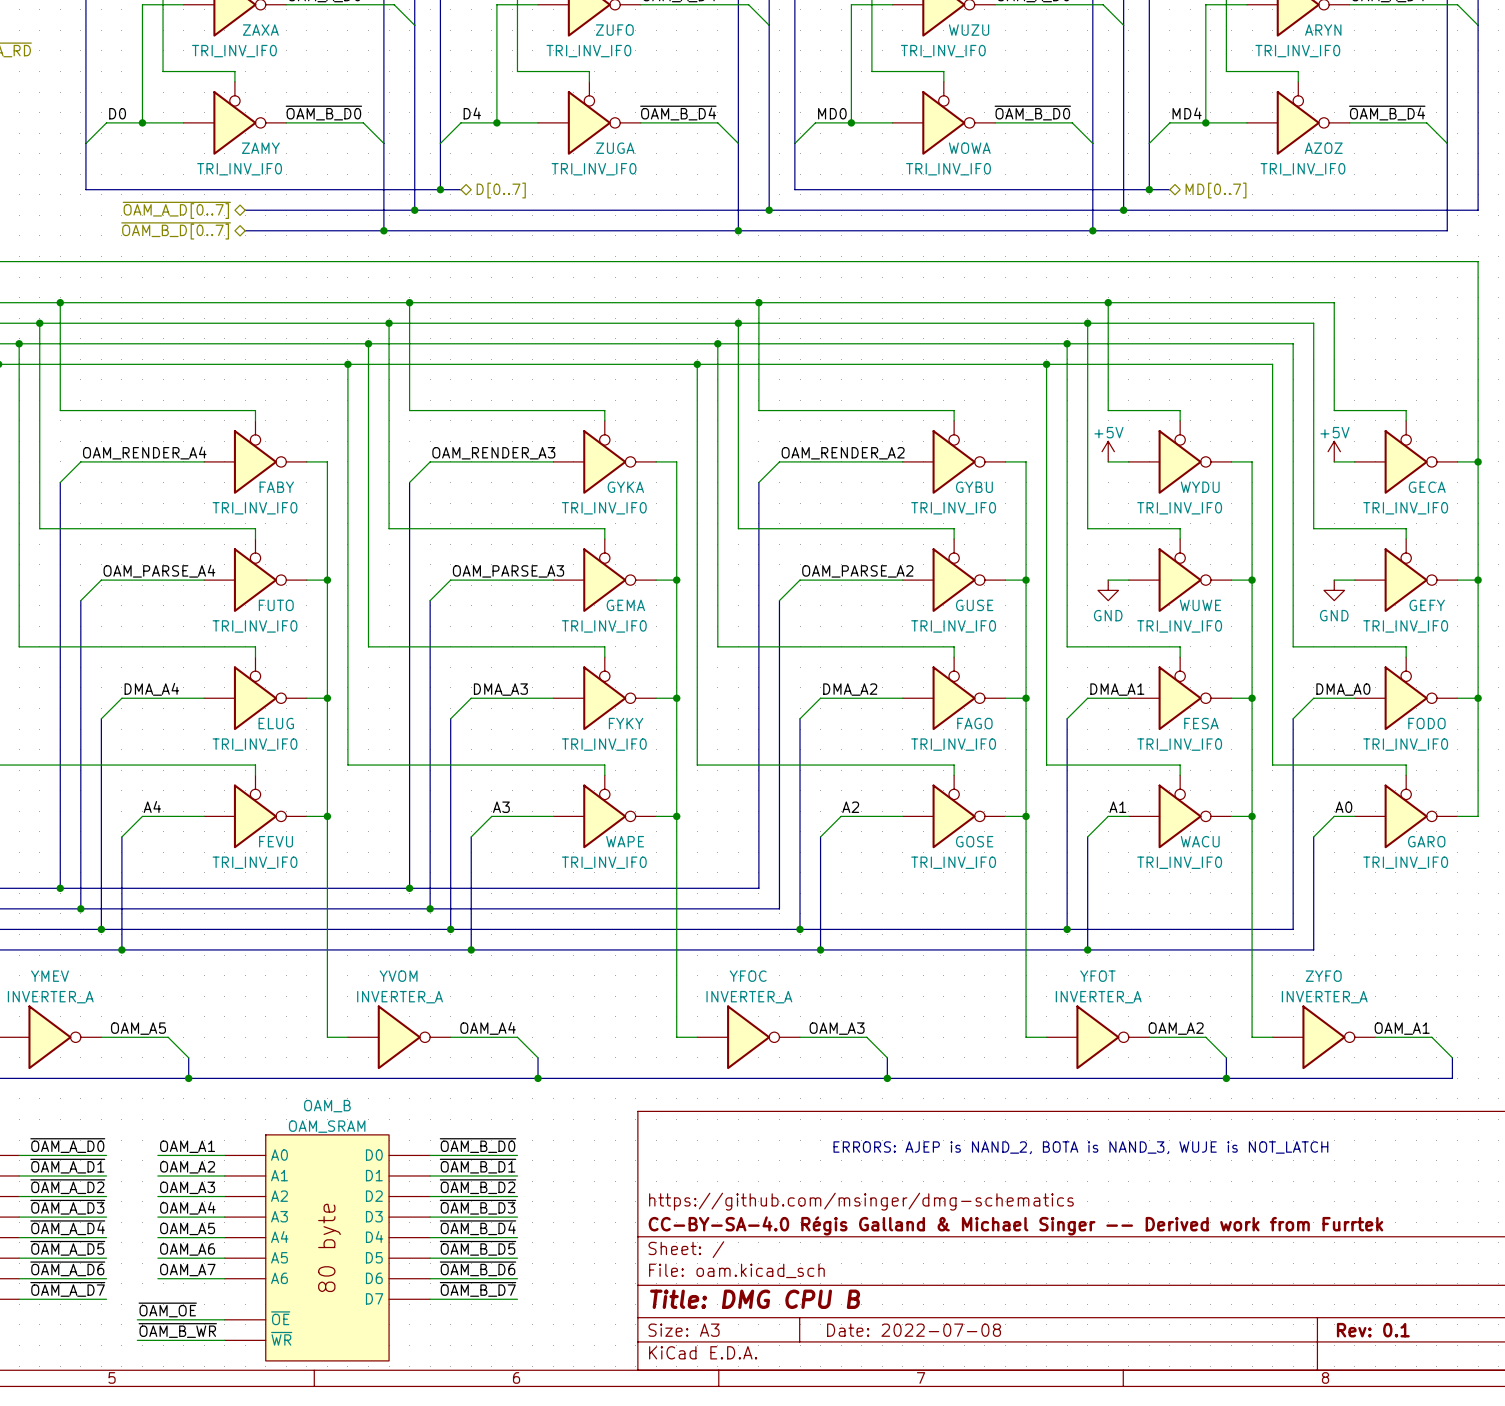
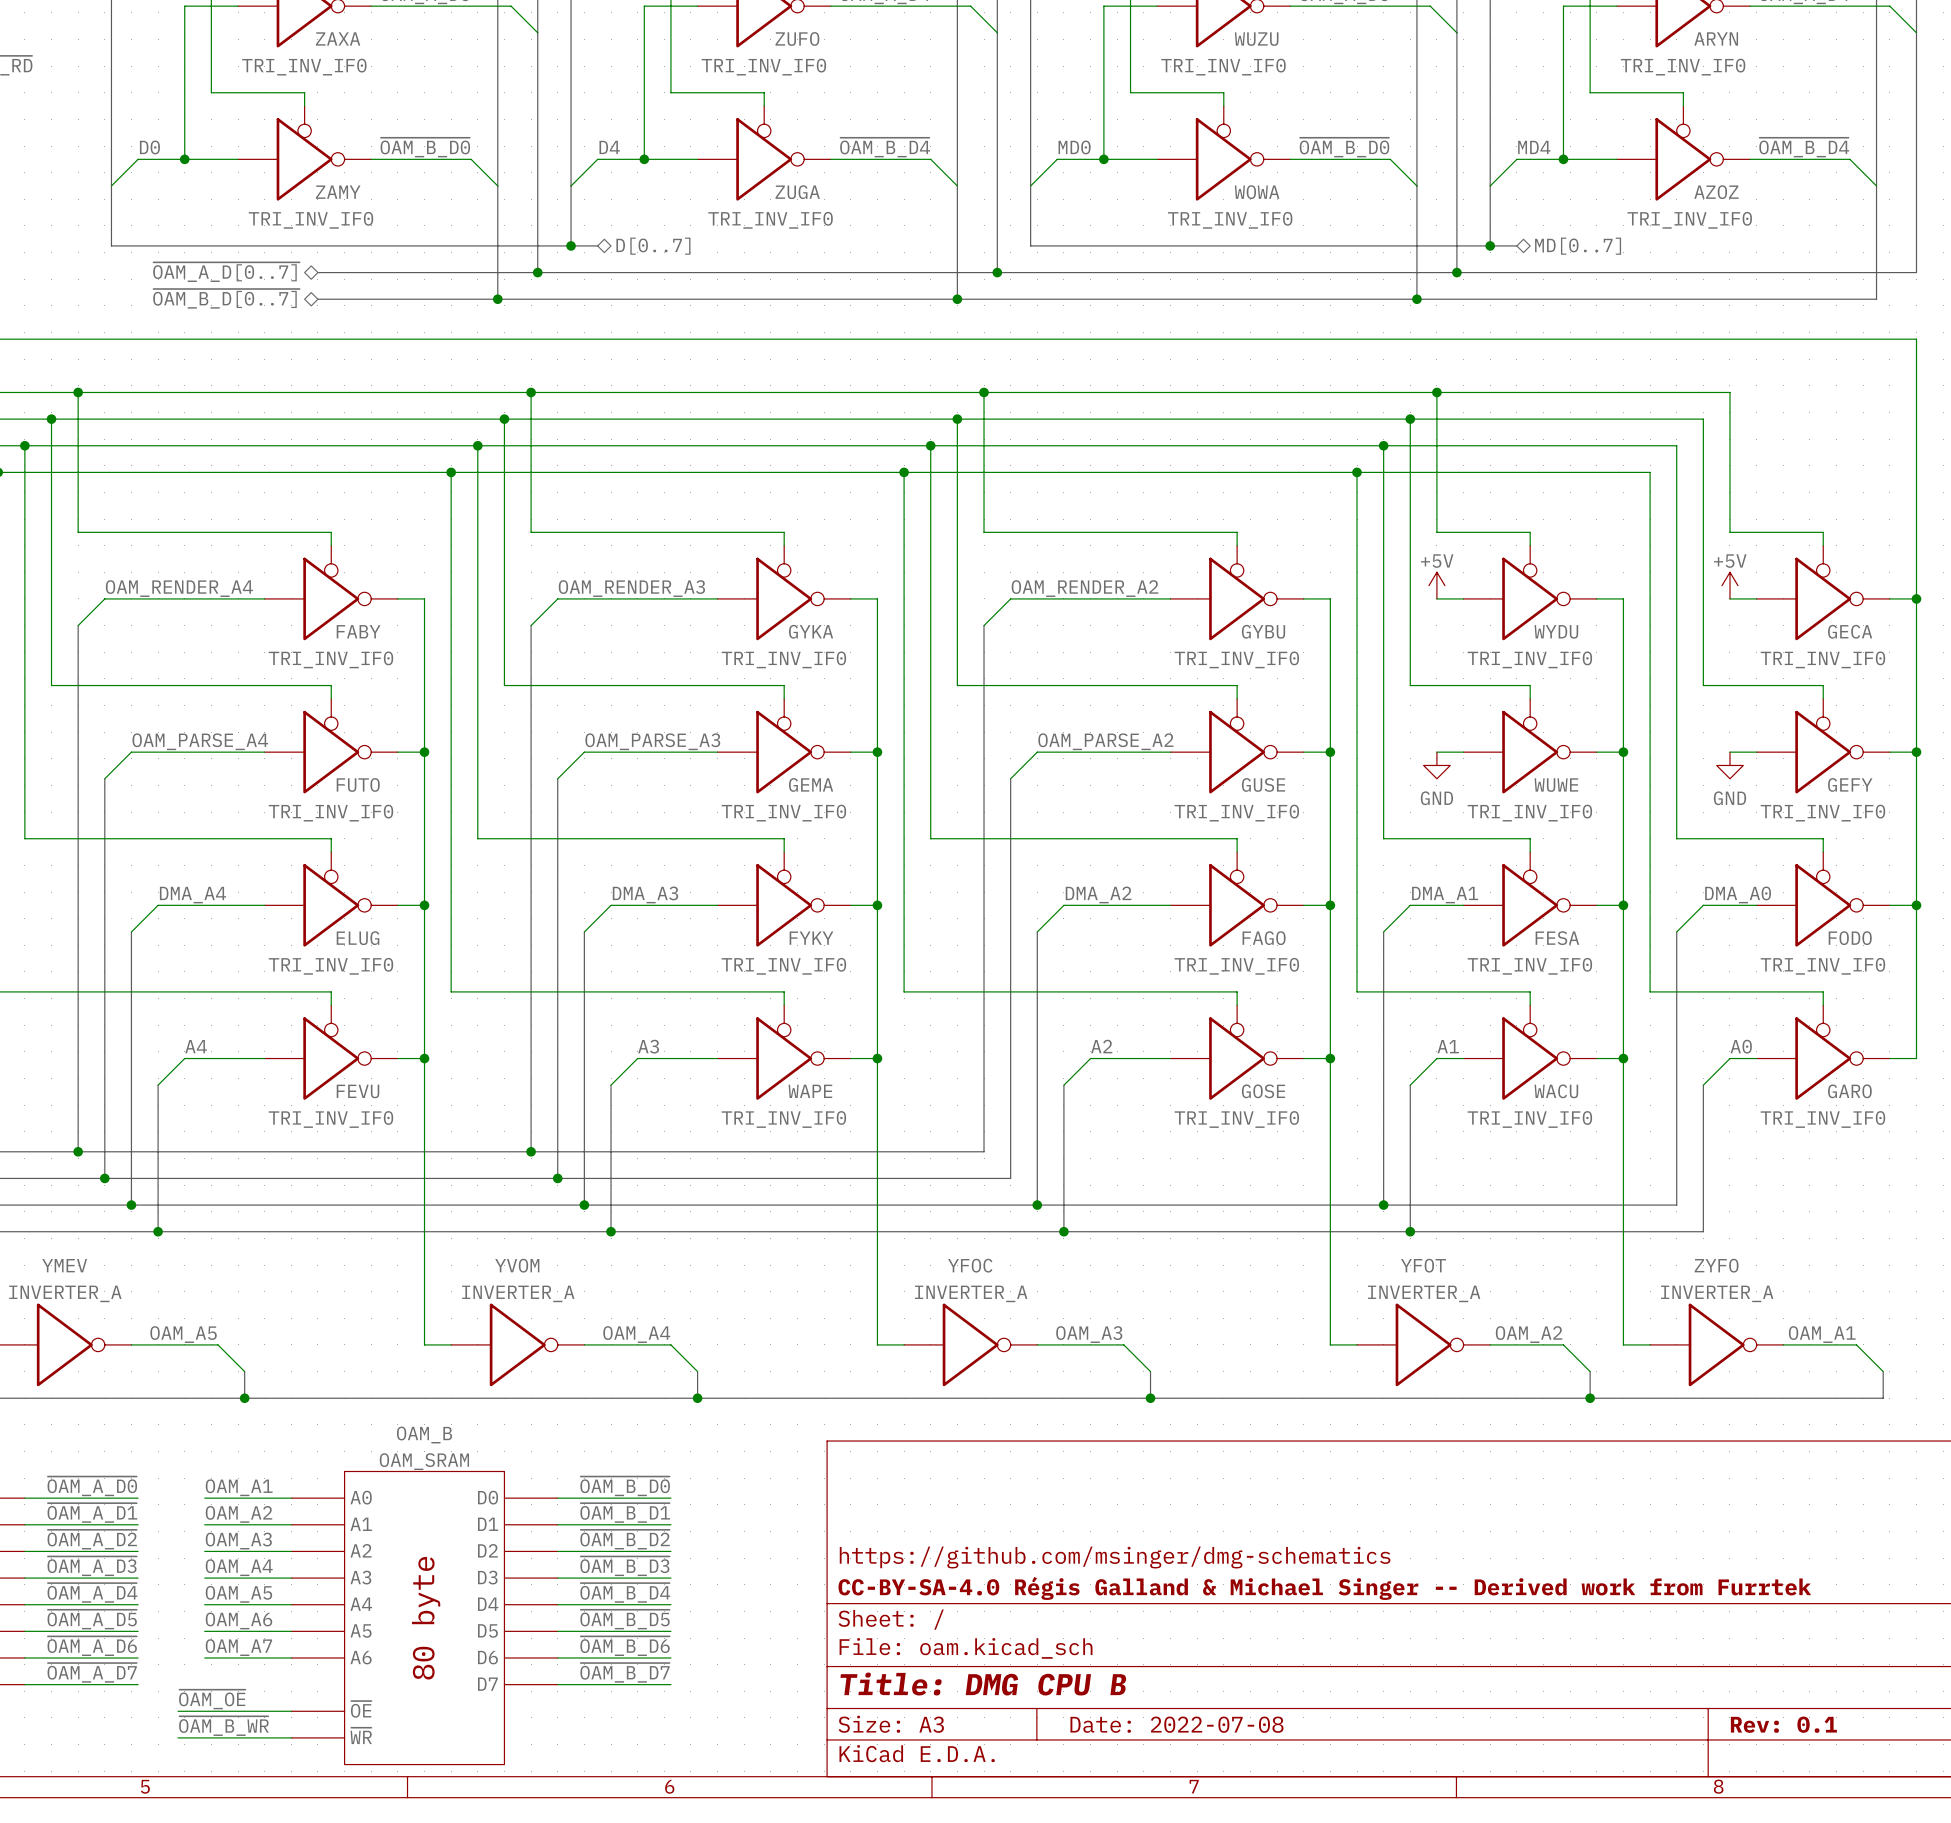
text: ERRORS: AJEP is NAND_2, BOTA is NAND_3, WUJE is NOT_LATCH (1080, 1147) -> none

